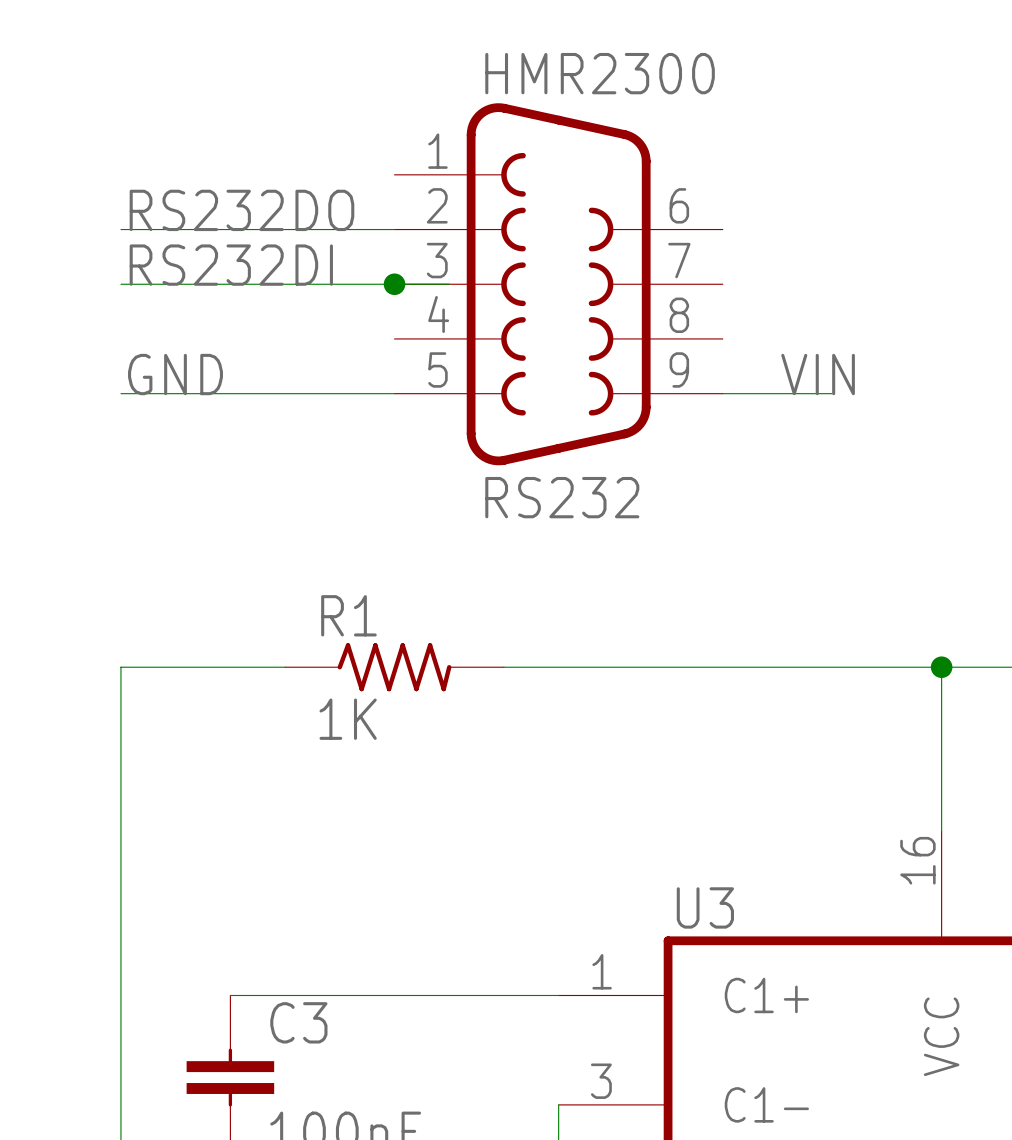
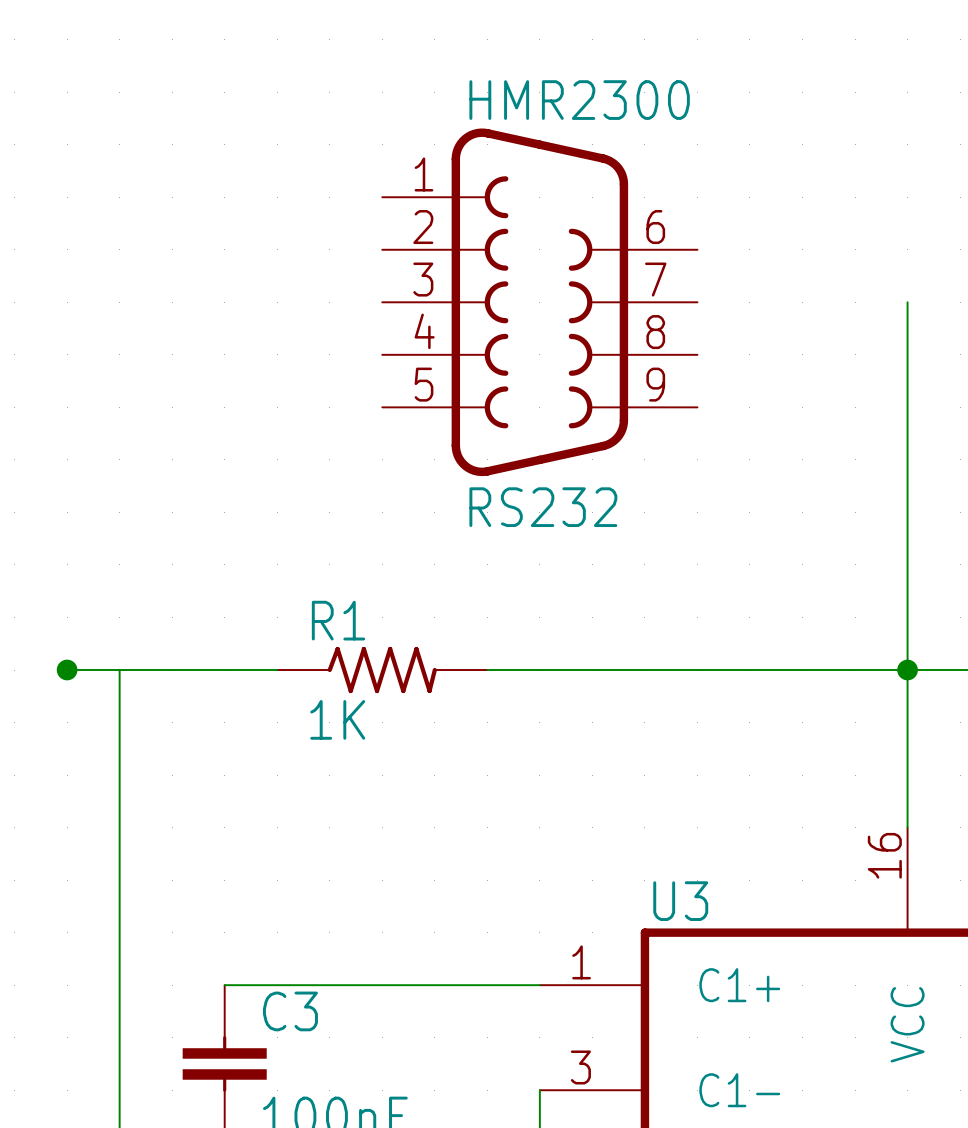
label: RS232DO (241, 210) -> none
wire: (120, 229) (394, 229) -> none
label: RS232DI (231, 265) -> none
wire: (120, 284) (449, 284) -> none
junction: (394, 284) -> none
wire: none -> (907, 302) (907, 670)
label: GND (175, 374) -> none
label: VIN (818, 374) -> none
wire: (120, 393) (394, 393) -> none
wire: (722, 393) (832, 393) -> none
wire: none -> (67, 670) (119, 670)
junction: none -> (67, 670)

